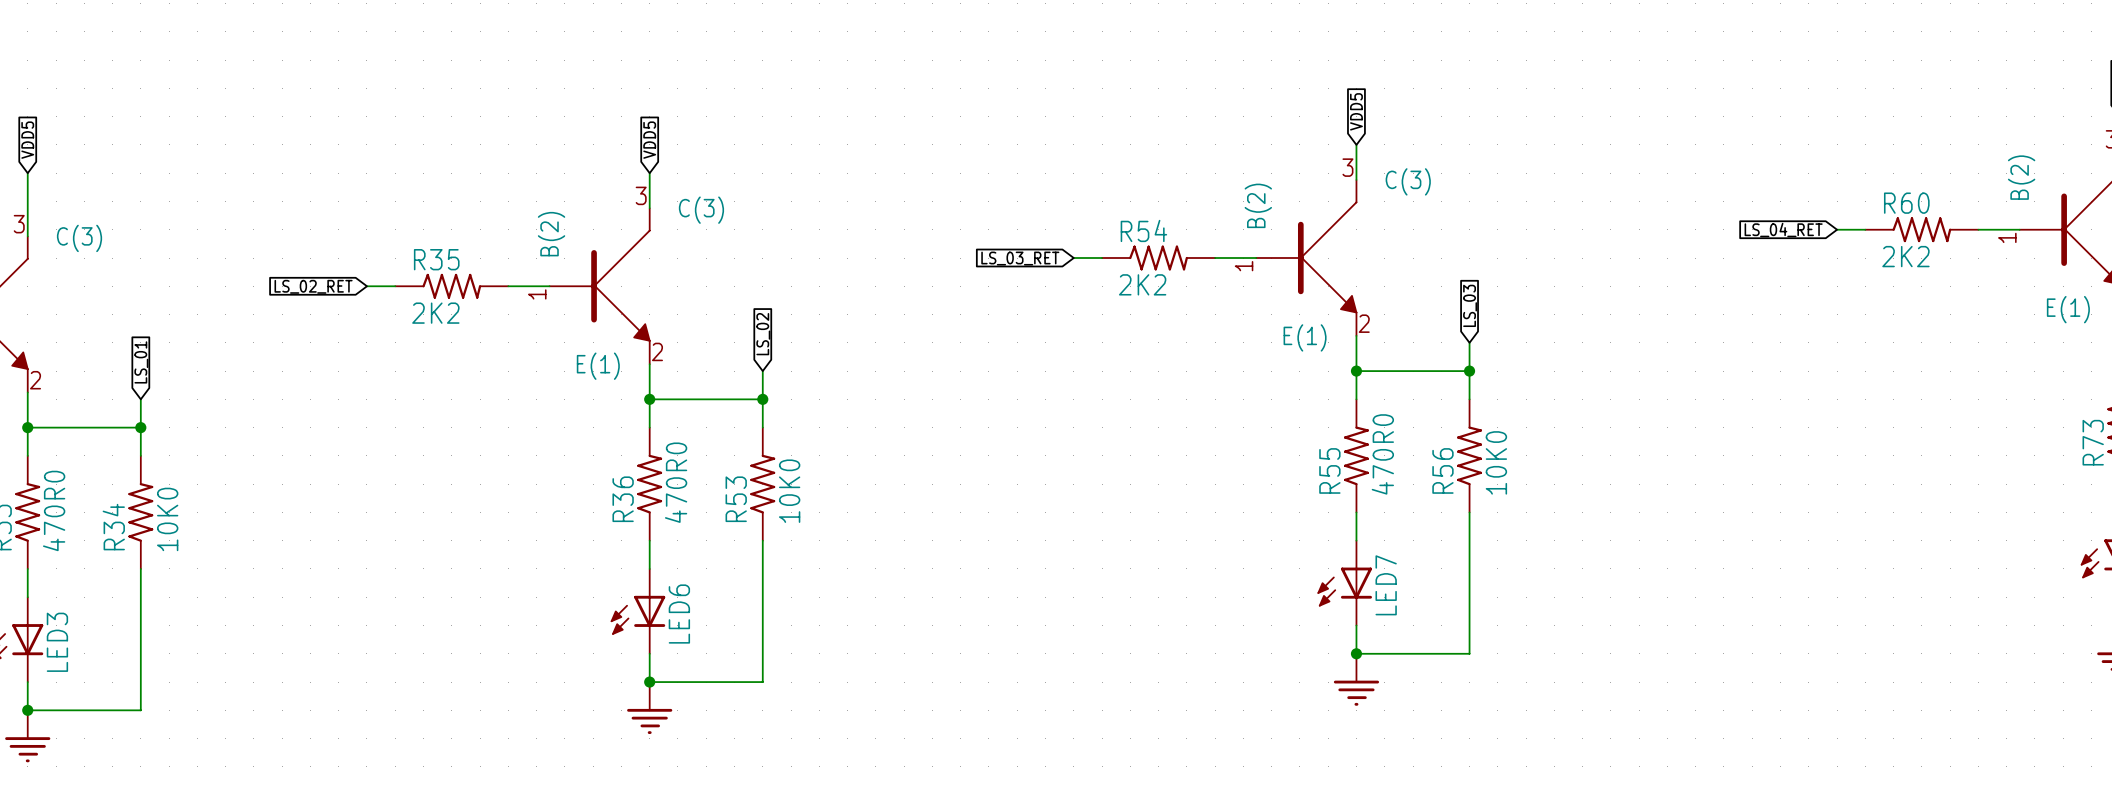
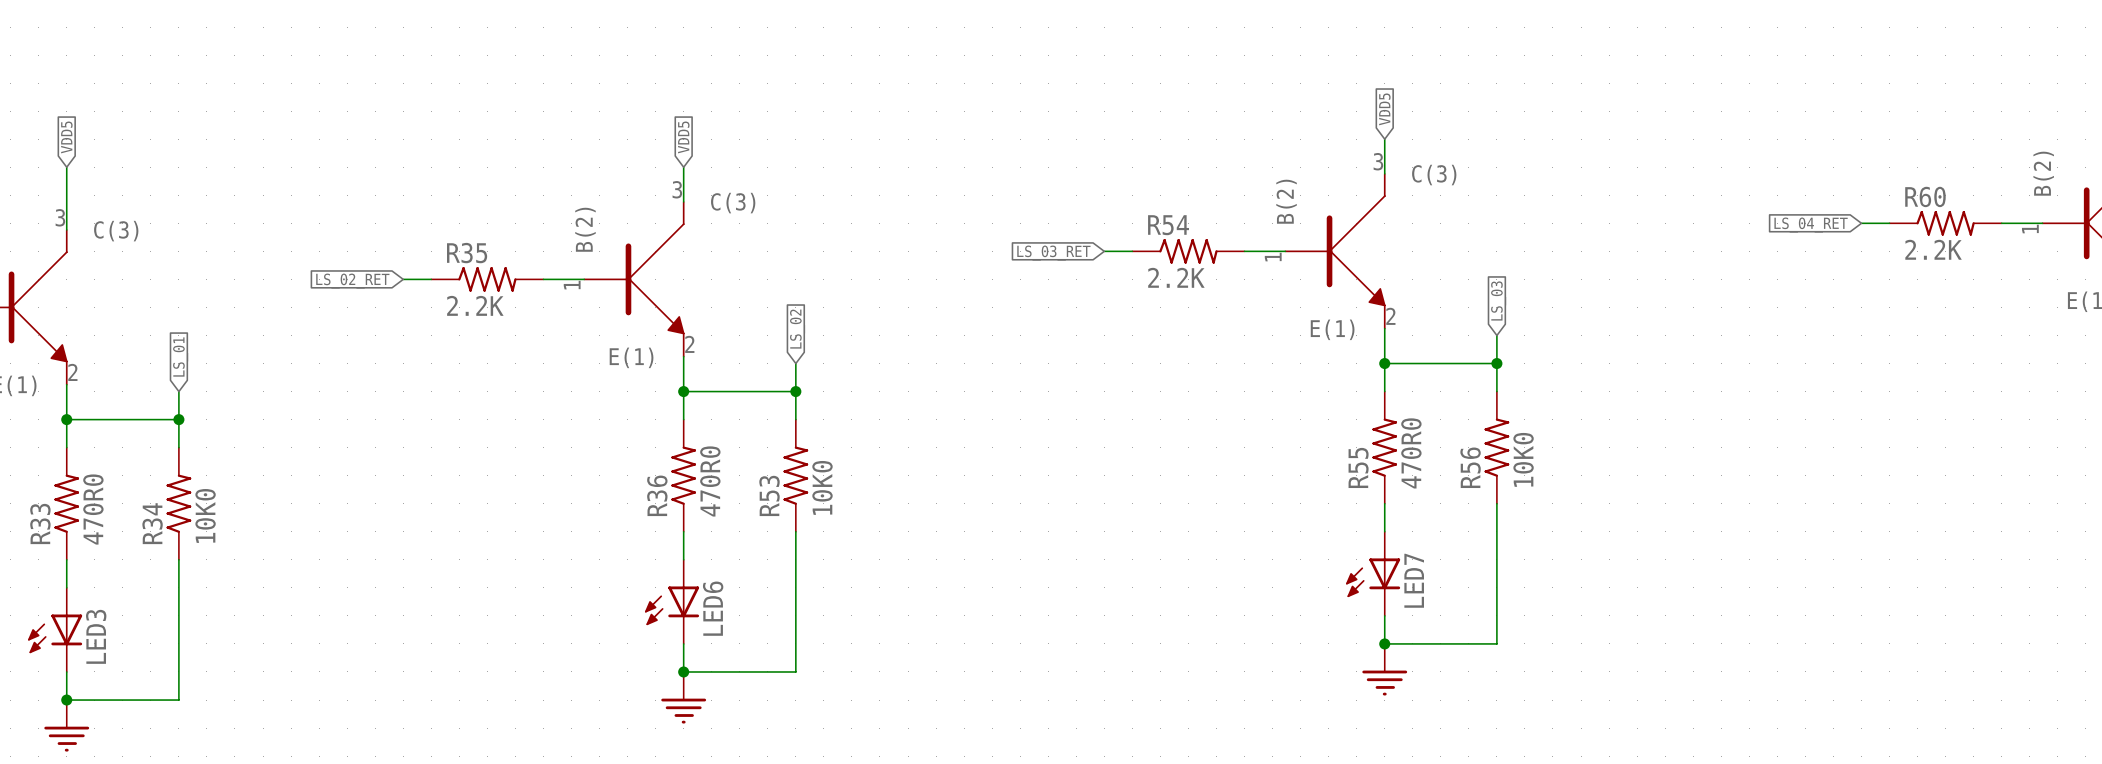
R60 value: 2K2 (1905, 256) -> 2.2K (1933, 249)
R54 value: 2K2 (1142, 284) -> 2.2K (1176, 277)
R35 value: 2K2 (435, 313) -> 2.2K (475, 305)

